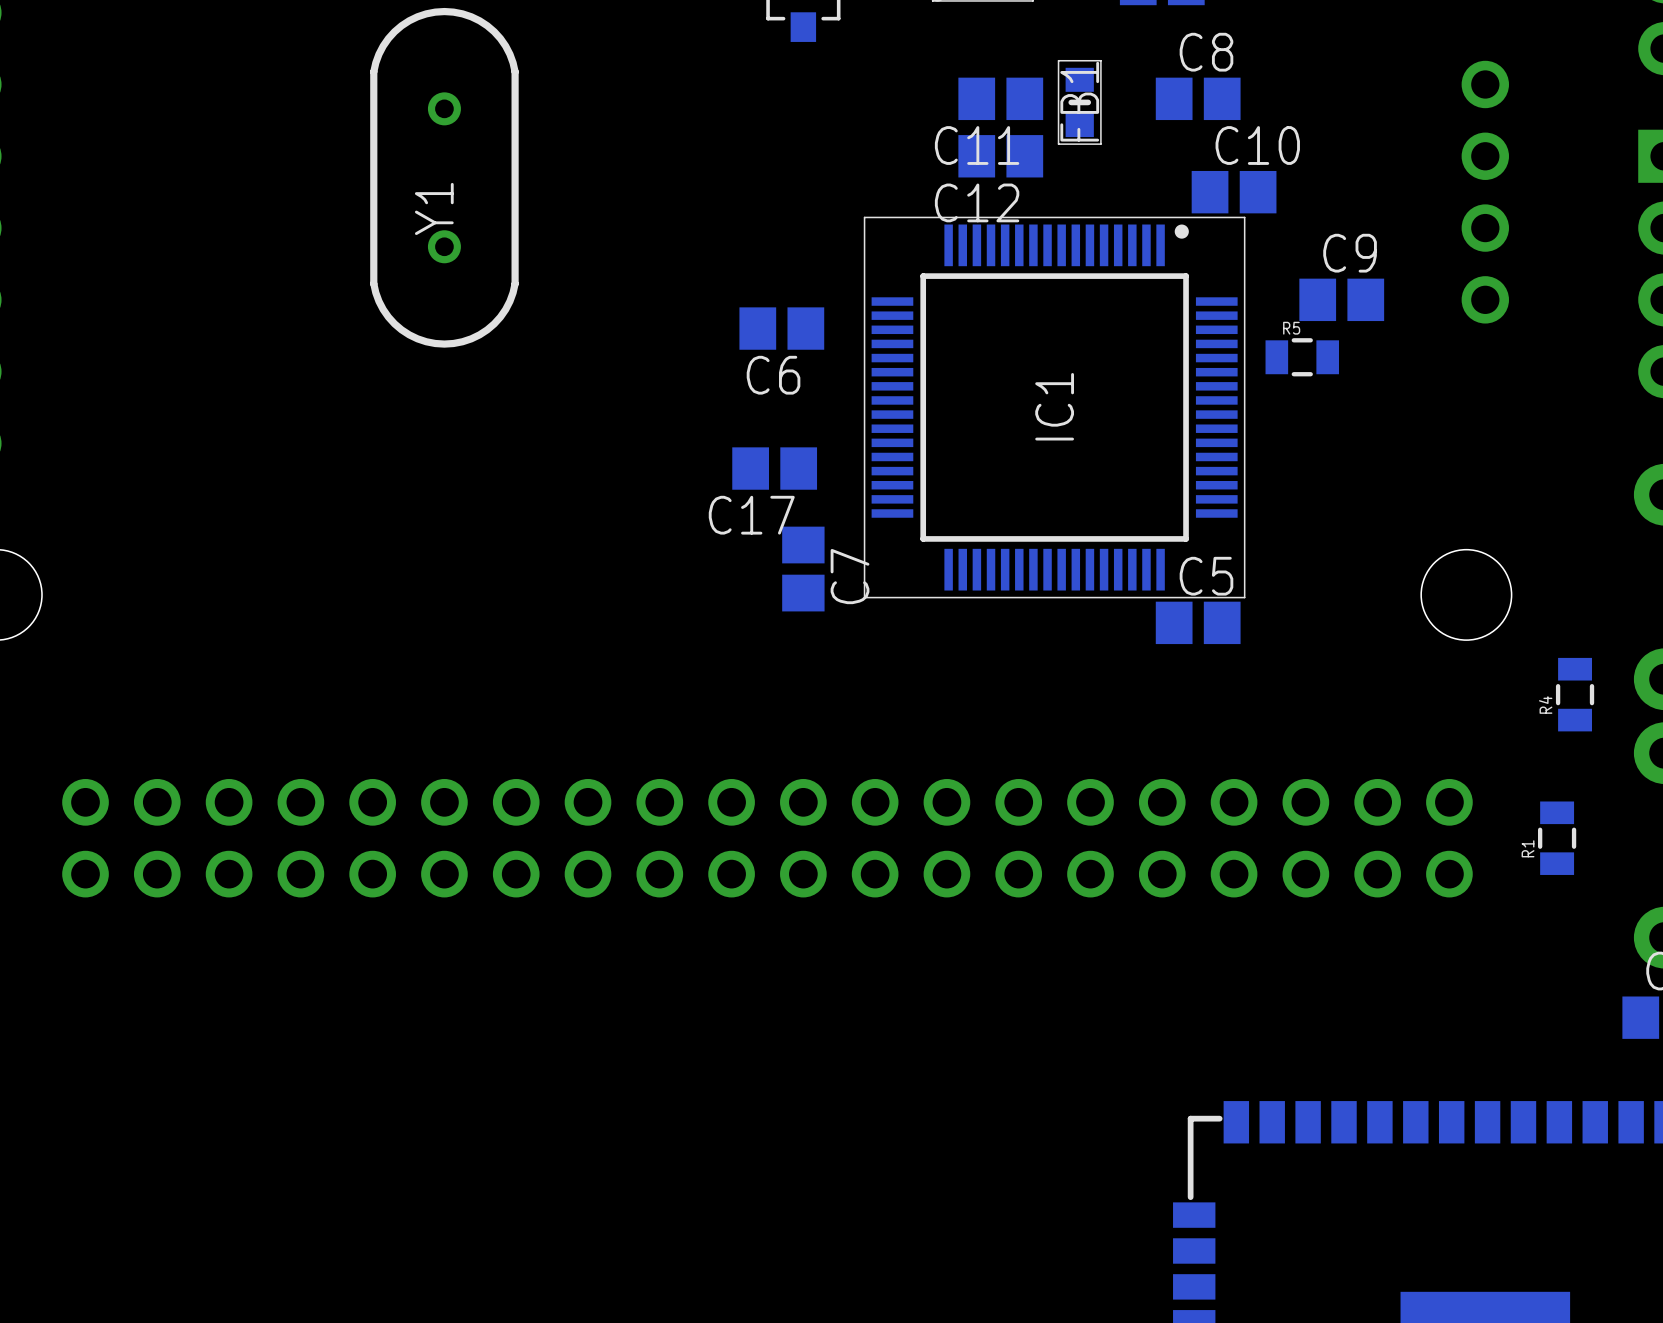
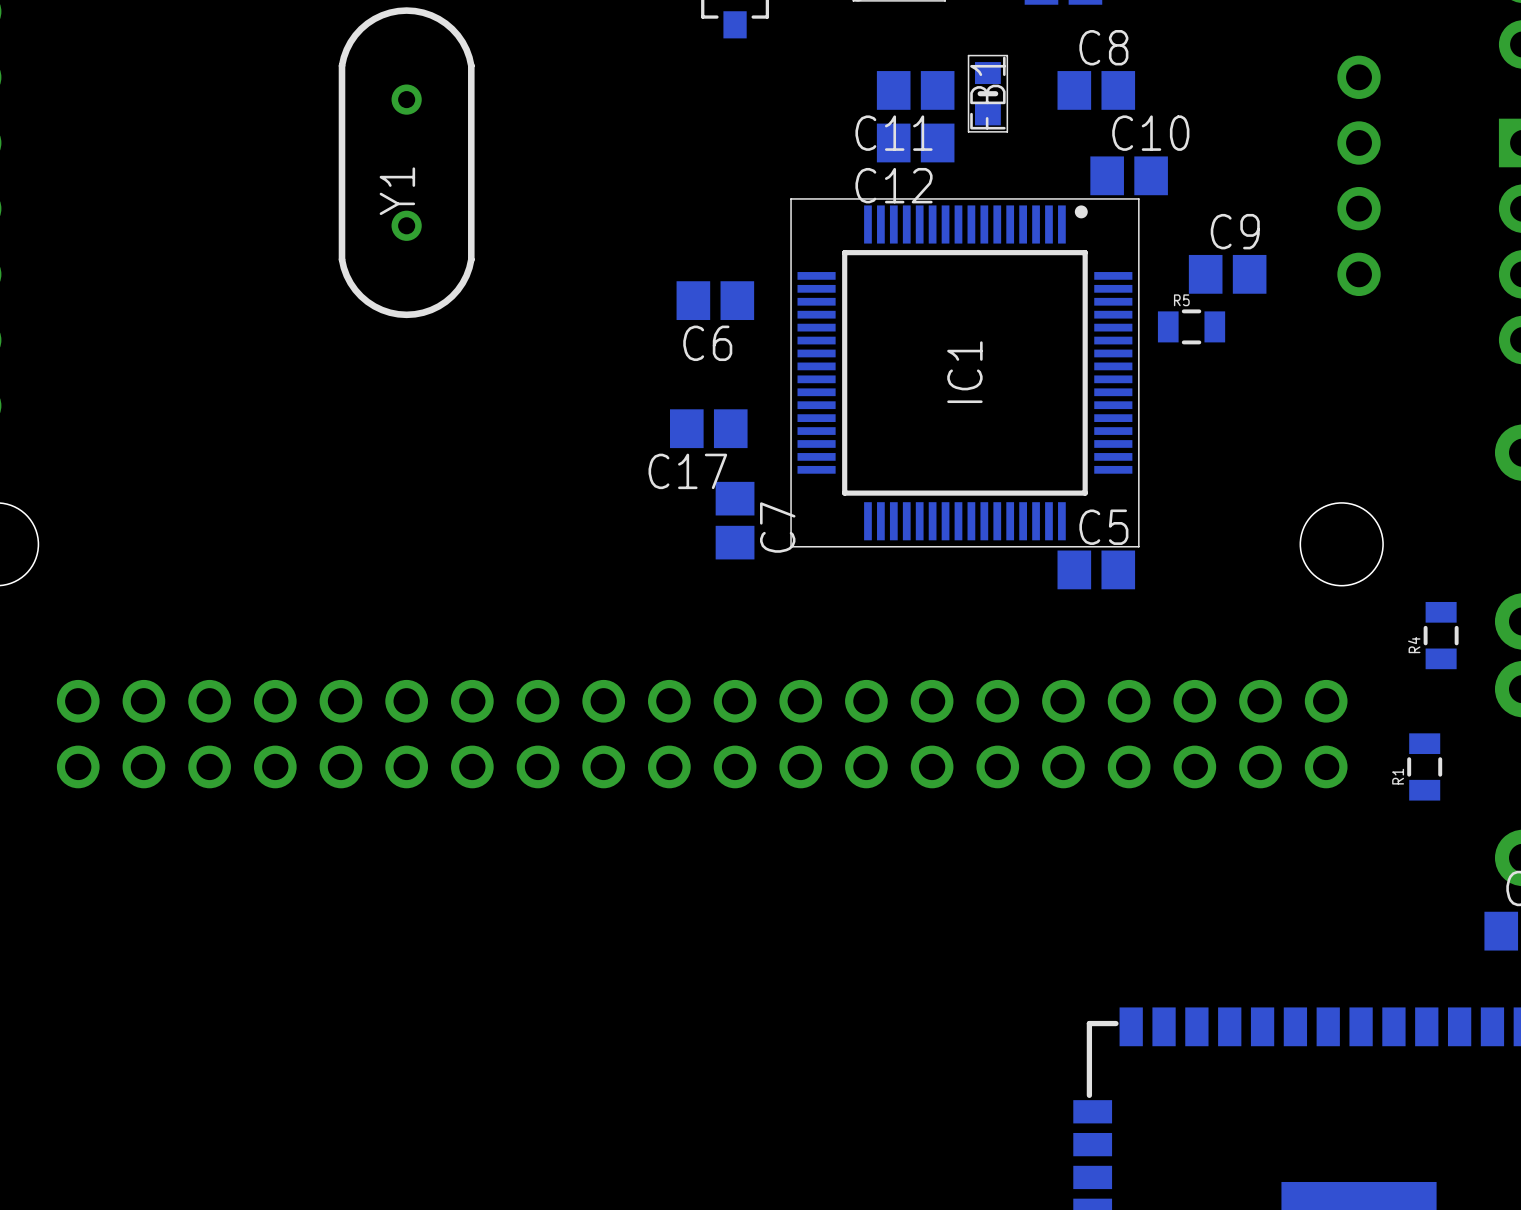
part position: (767, 838) -> (702, 734)

